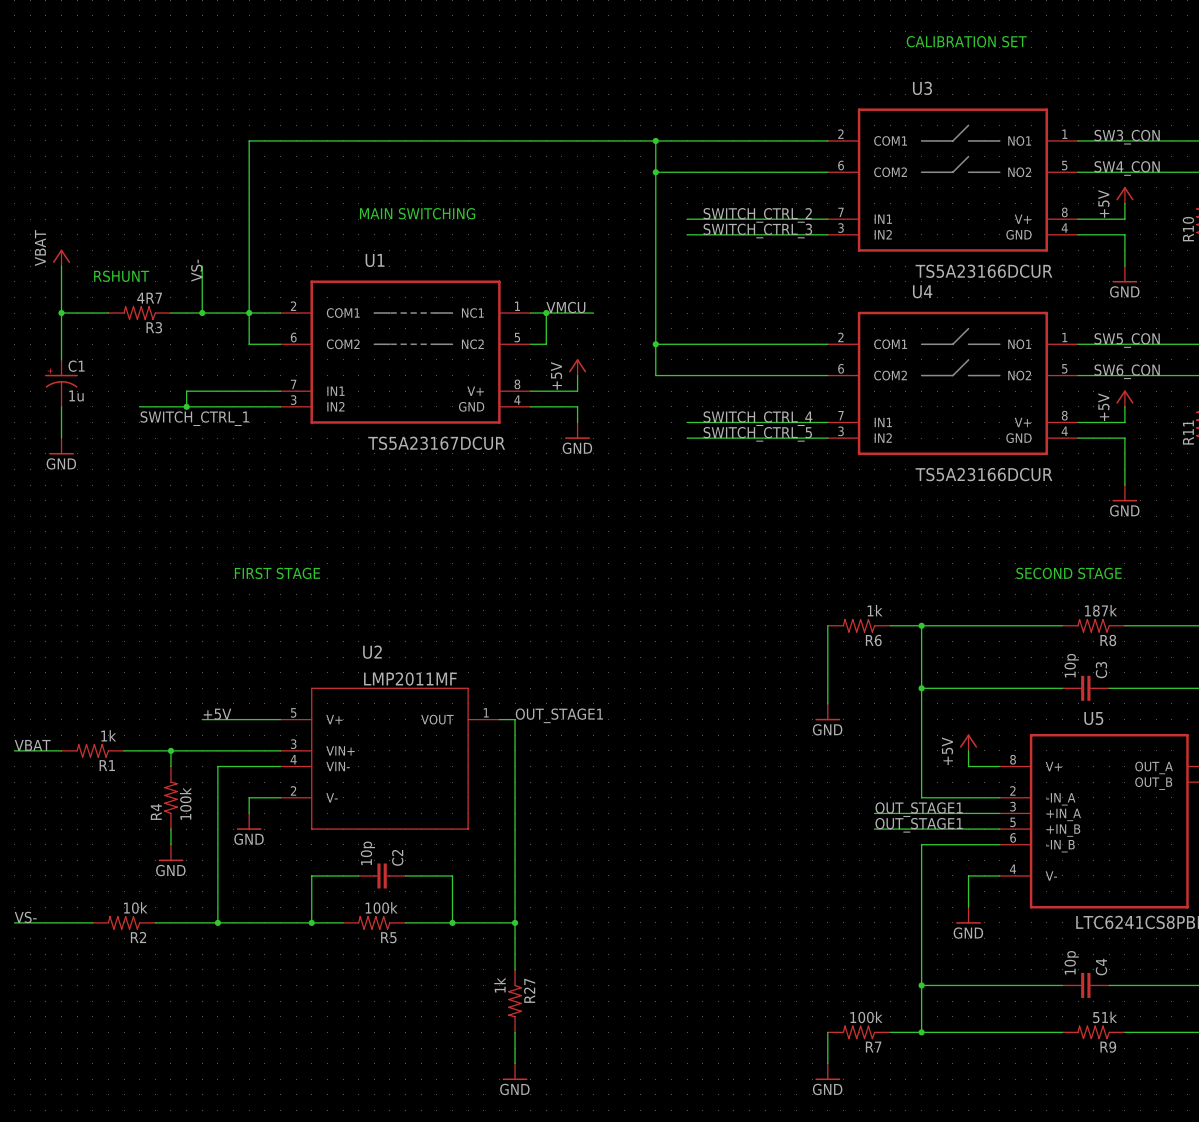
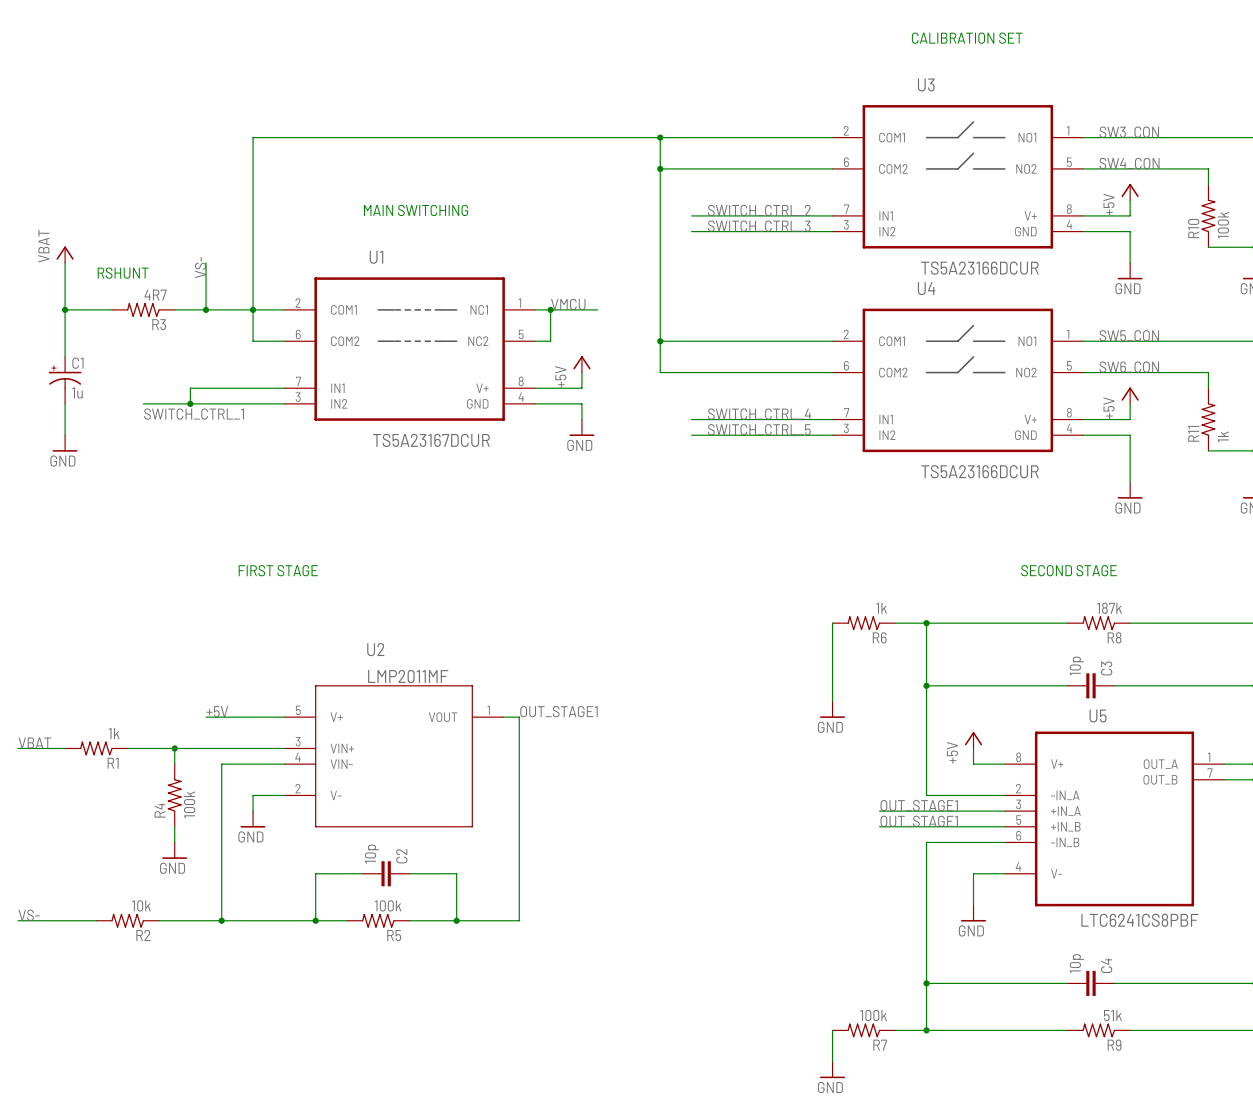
wire: (515, 922) (515, 969) -> none
junction: (515, 922) -> none
R27: 1k (515, 1001) -> none
wire: (515, 1032) (515, 1063) -> none
power symbol: GND (515, 1071) -> none

